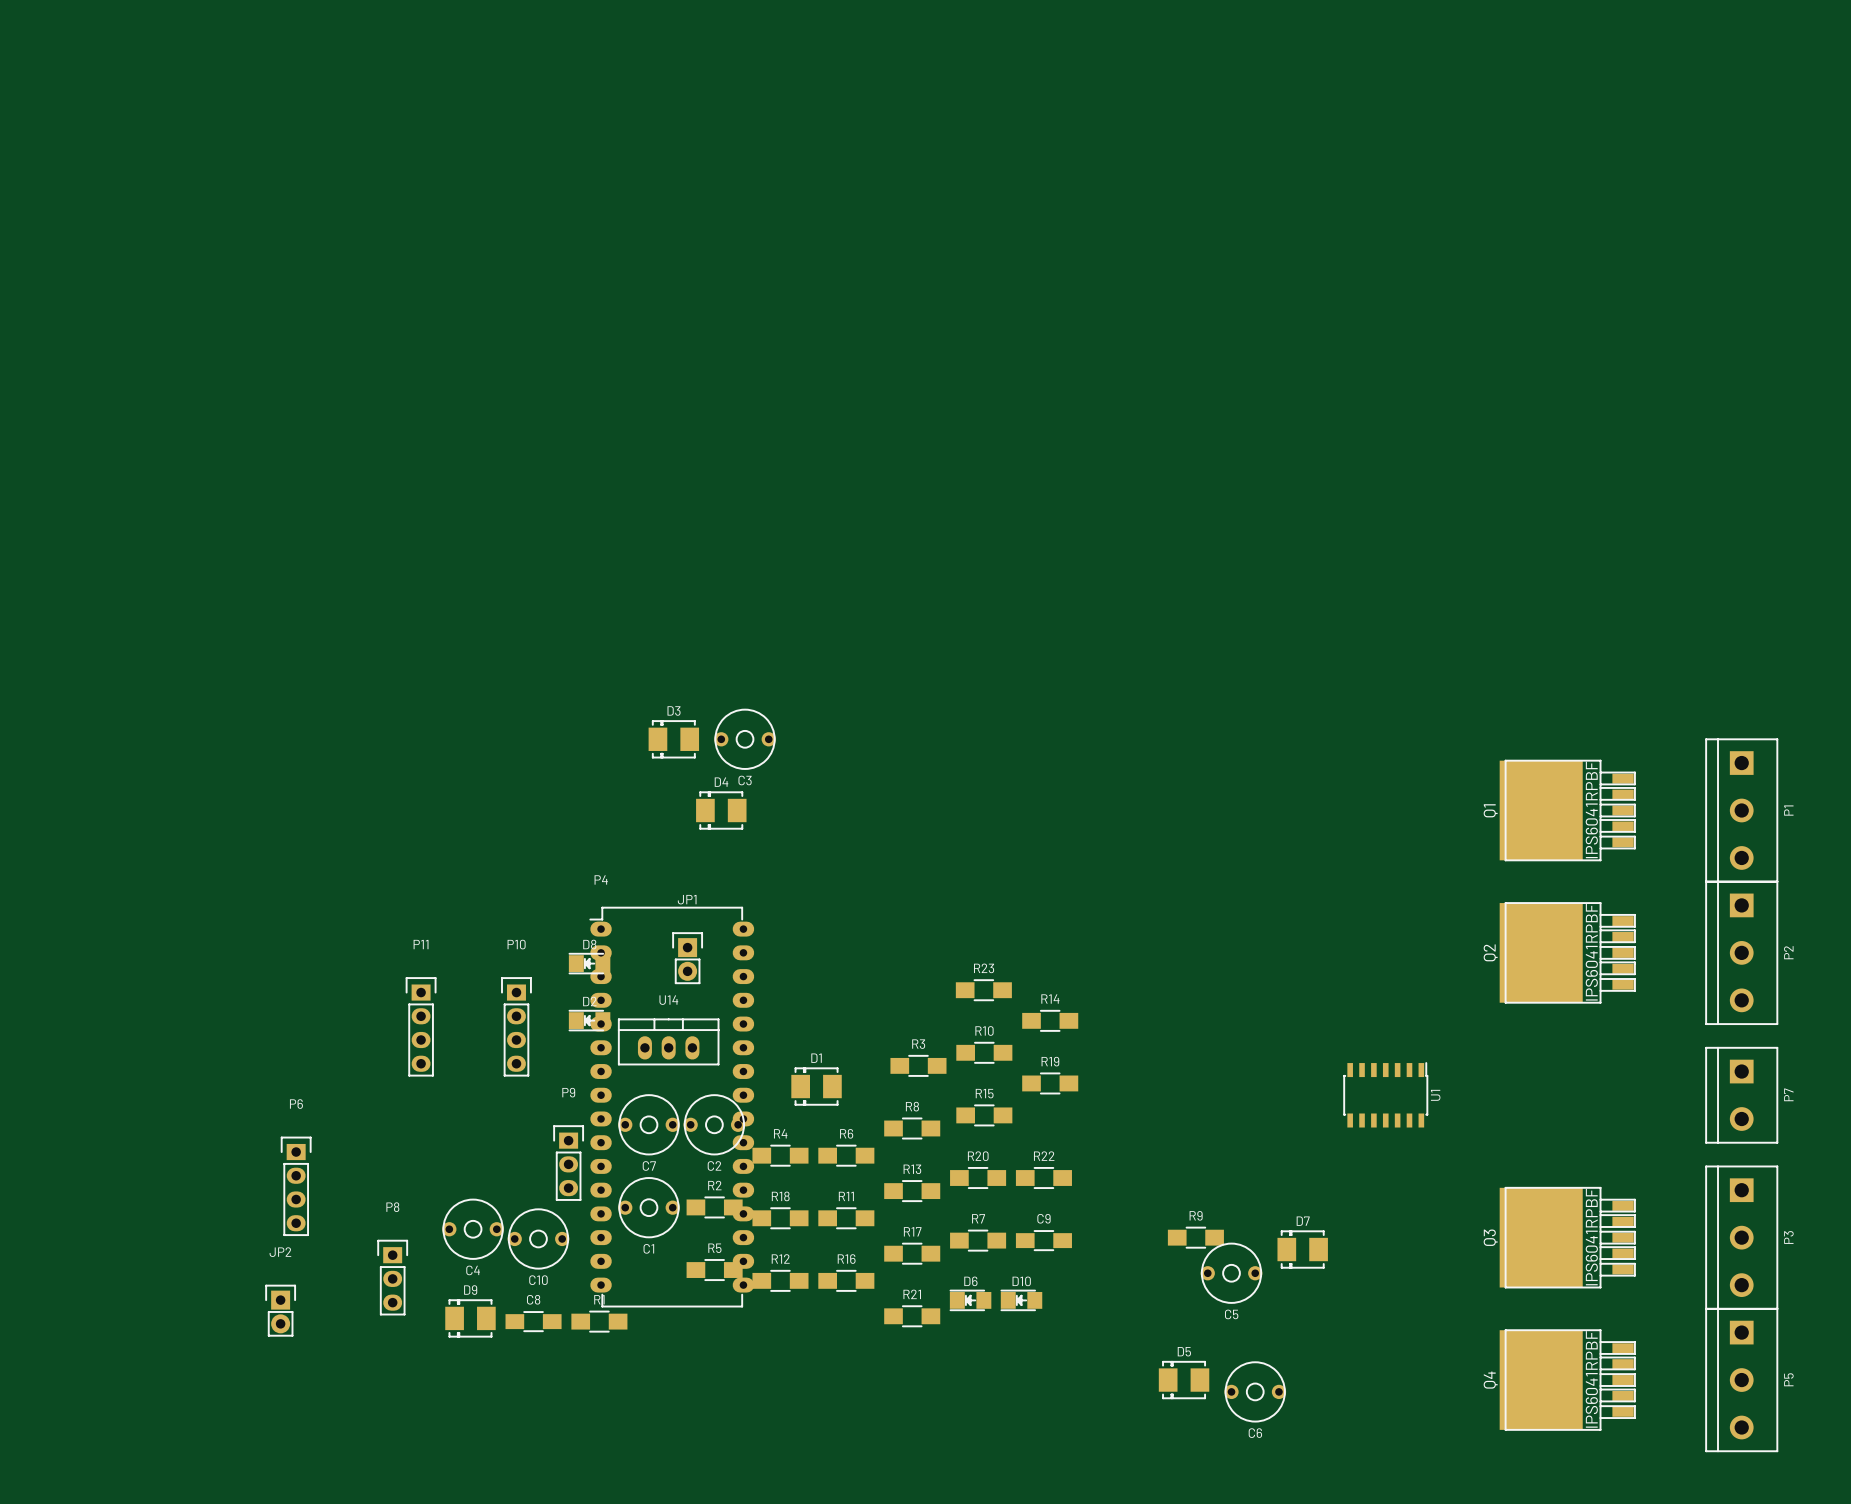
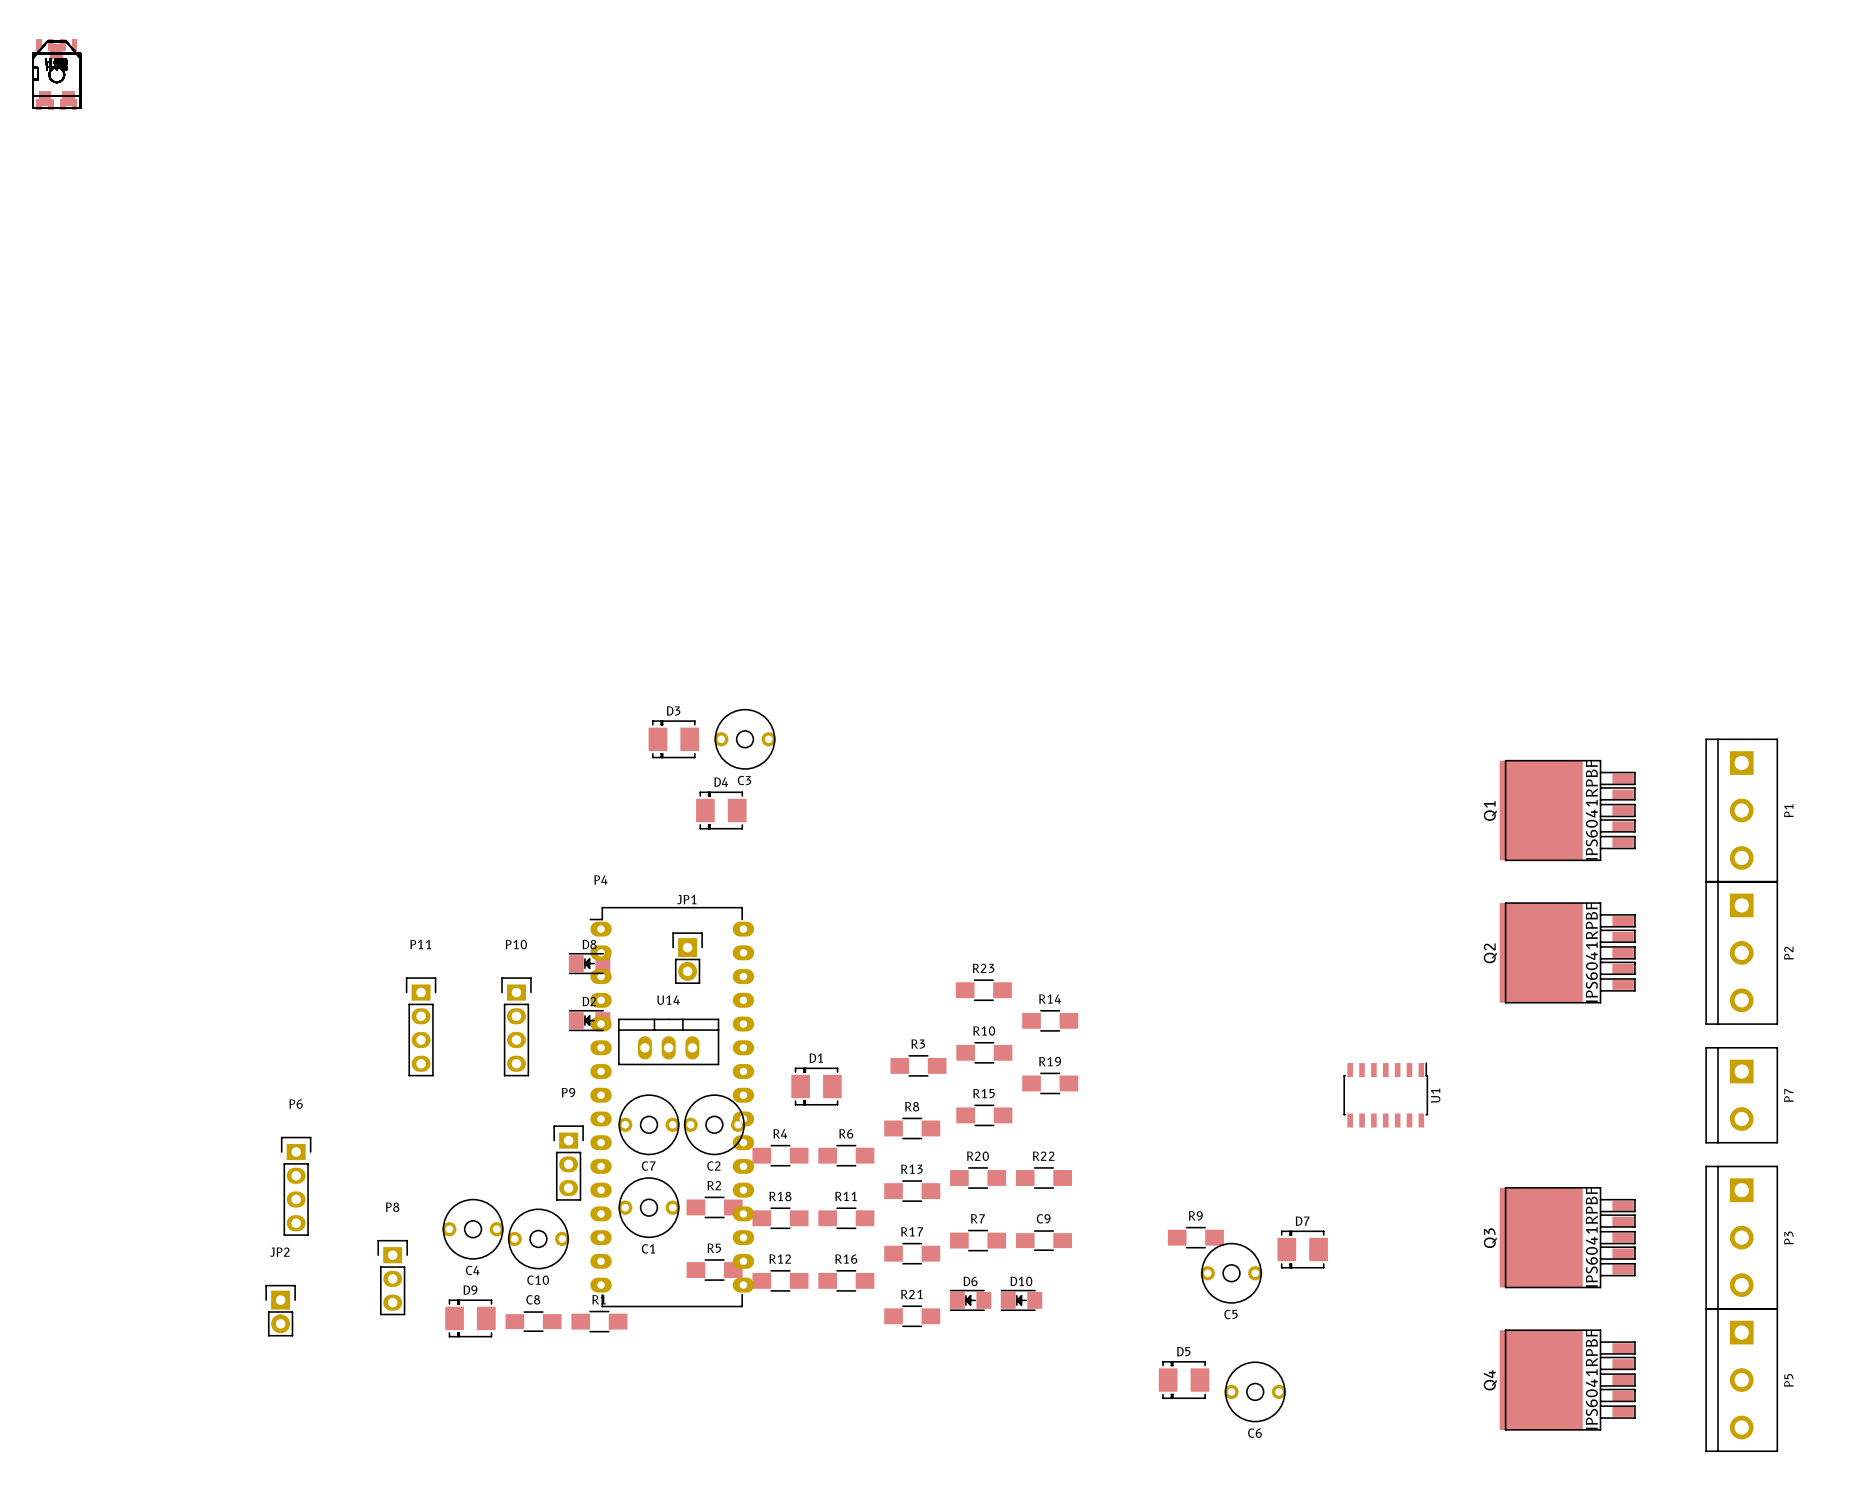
part: none -> (56, 74)
part: none -> (56, 74)
part: none -> (56, 74)
part: none -> (56, 74)
part: none -> (56, 74)
part: none -> (56, 74)
part: none -> (56, 74)
part: none -> (56, 74)
part: none -> (56, 74)
part: none -> (56, 74)
part: none -> (56, 74)
part: none -> (56, 74)
part: none -> (56, 74)
part: none -> (56, 74)
part: none -> (56, 74)
part: none -> (56, 74)
part: none -> (56, 74)
part: none -> (56, 74)
part: none -> (56, 74)
part: none -> (56, 74)

